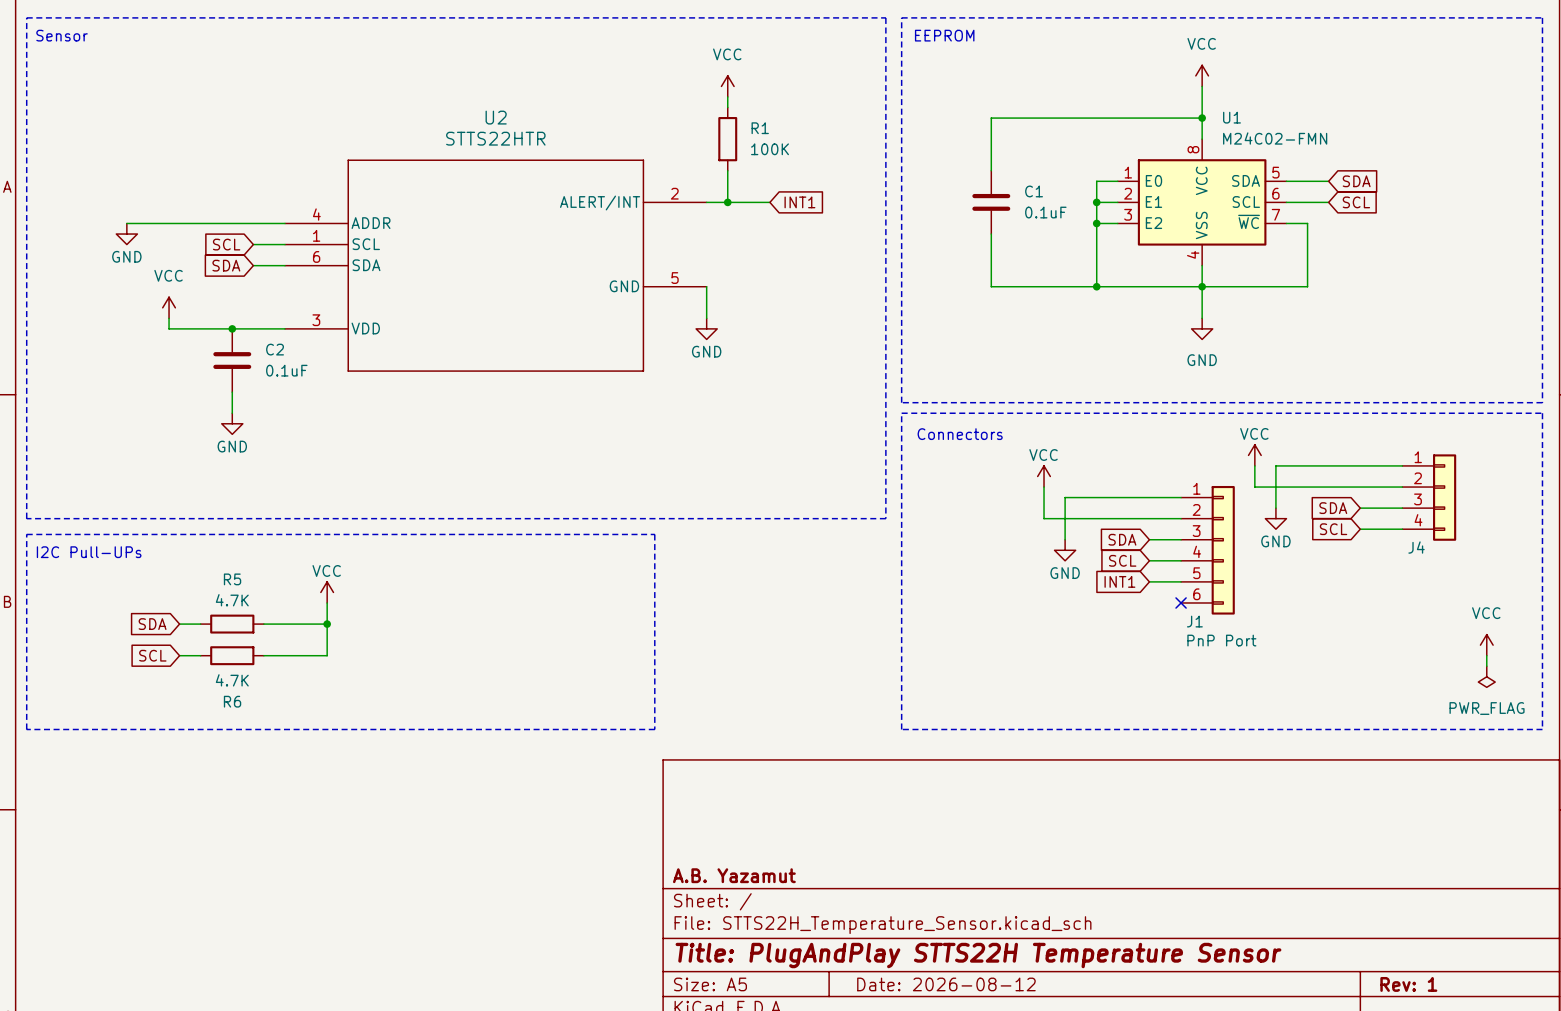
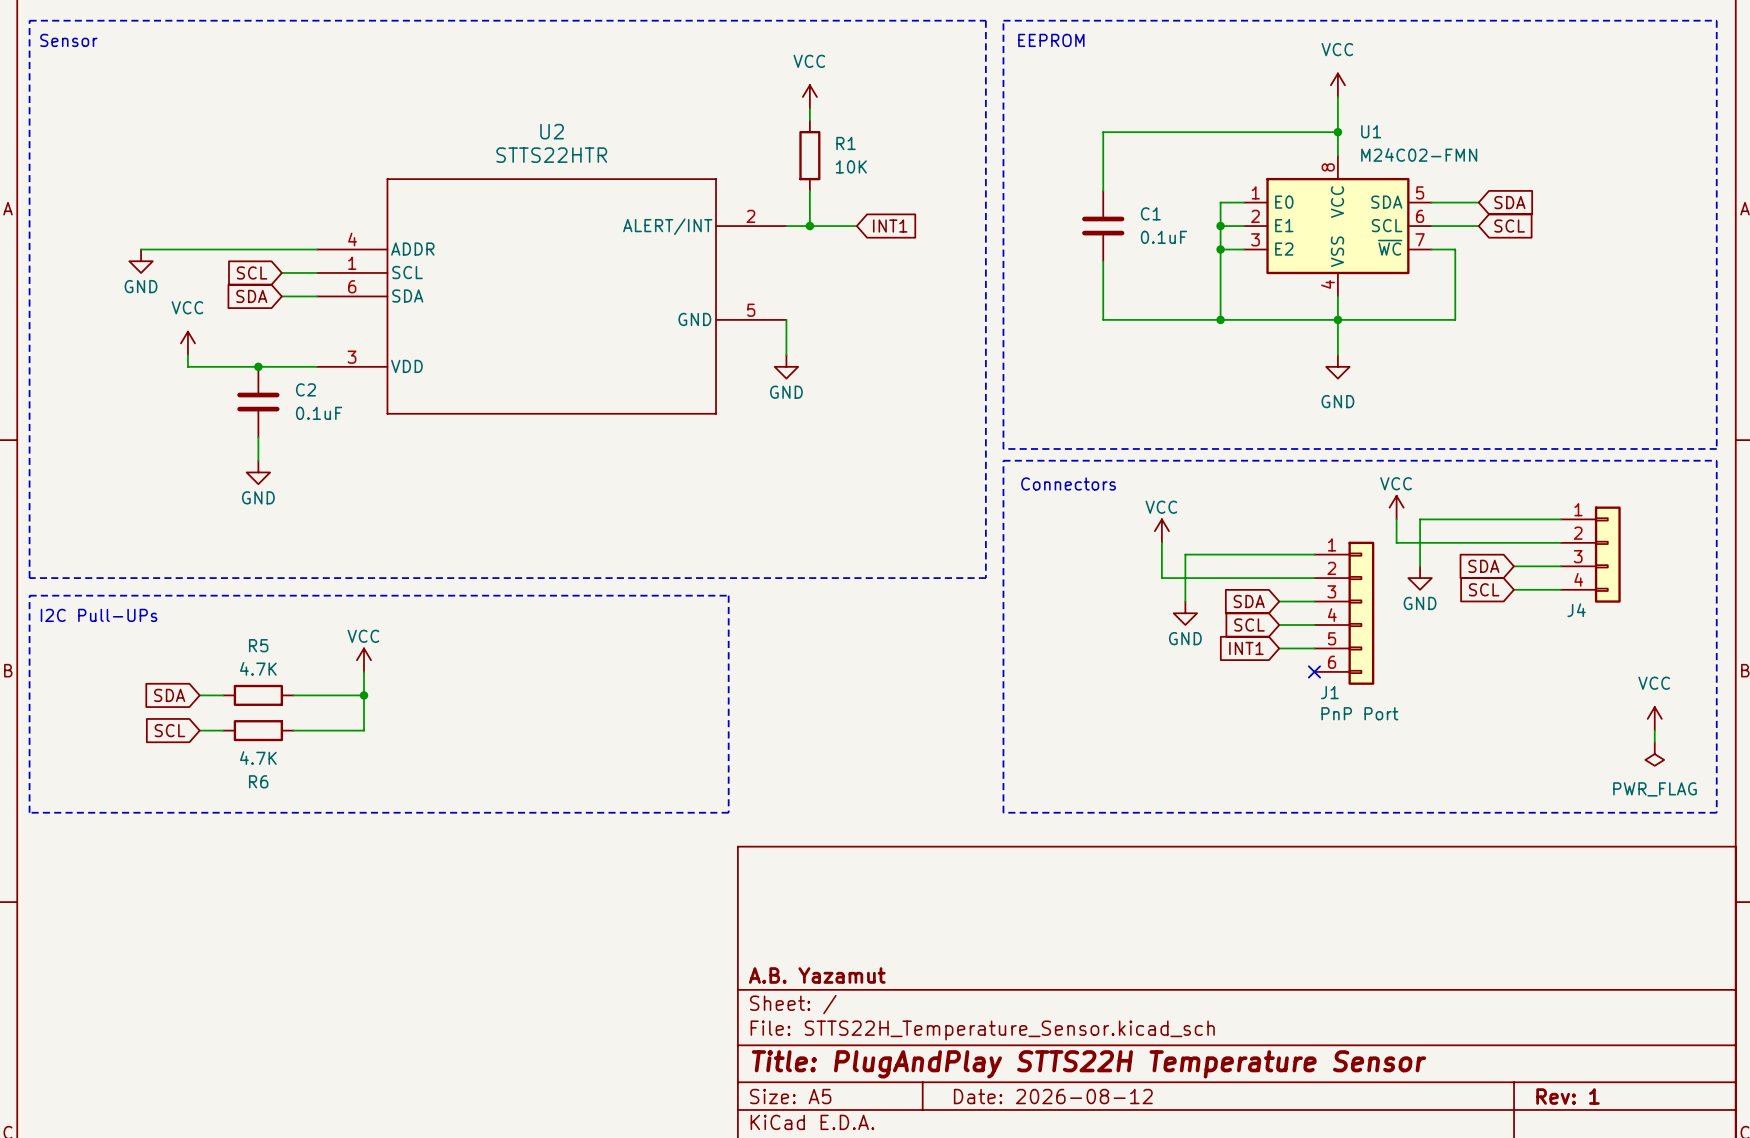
R1 value: 100K (770, 149) -> 10K (851, 166)

